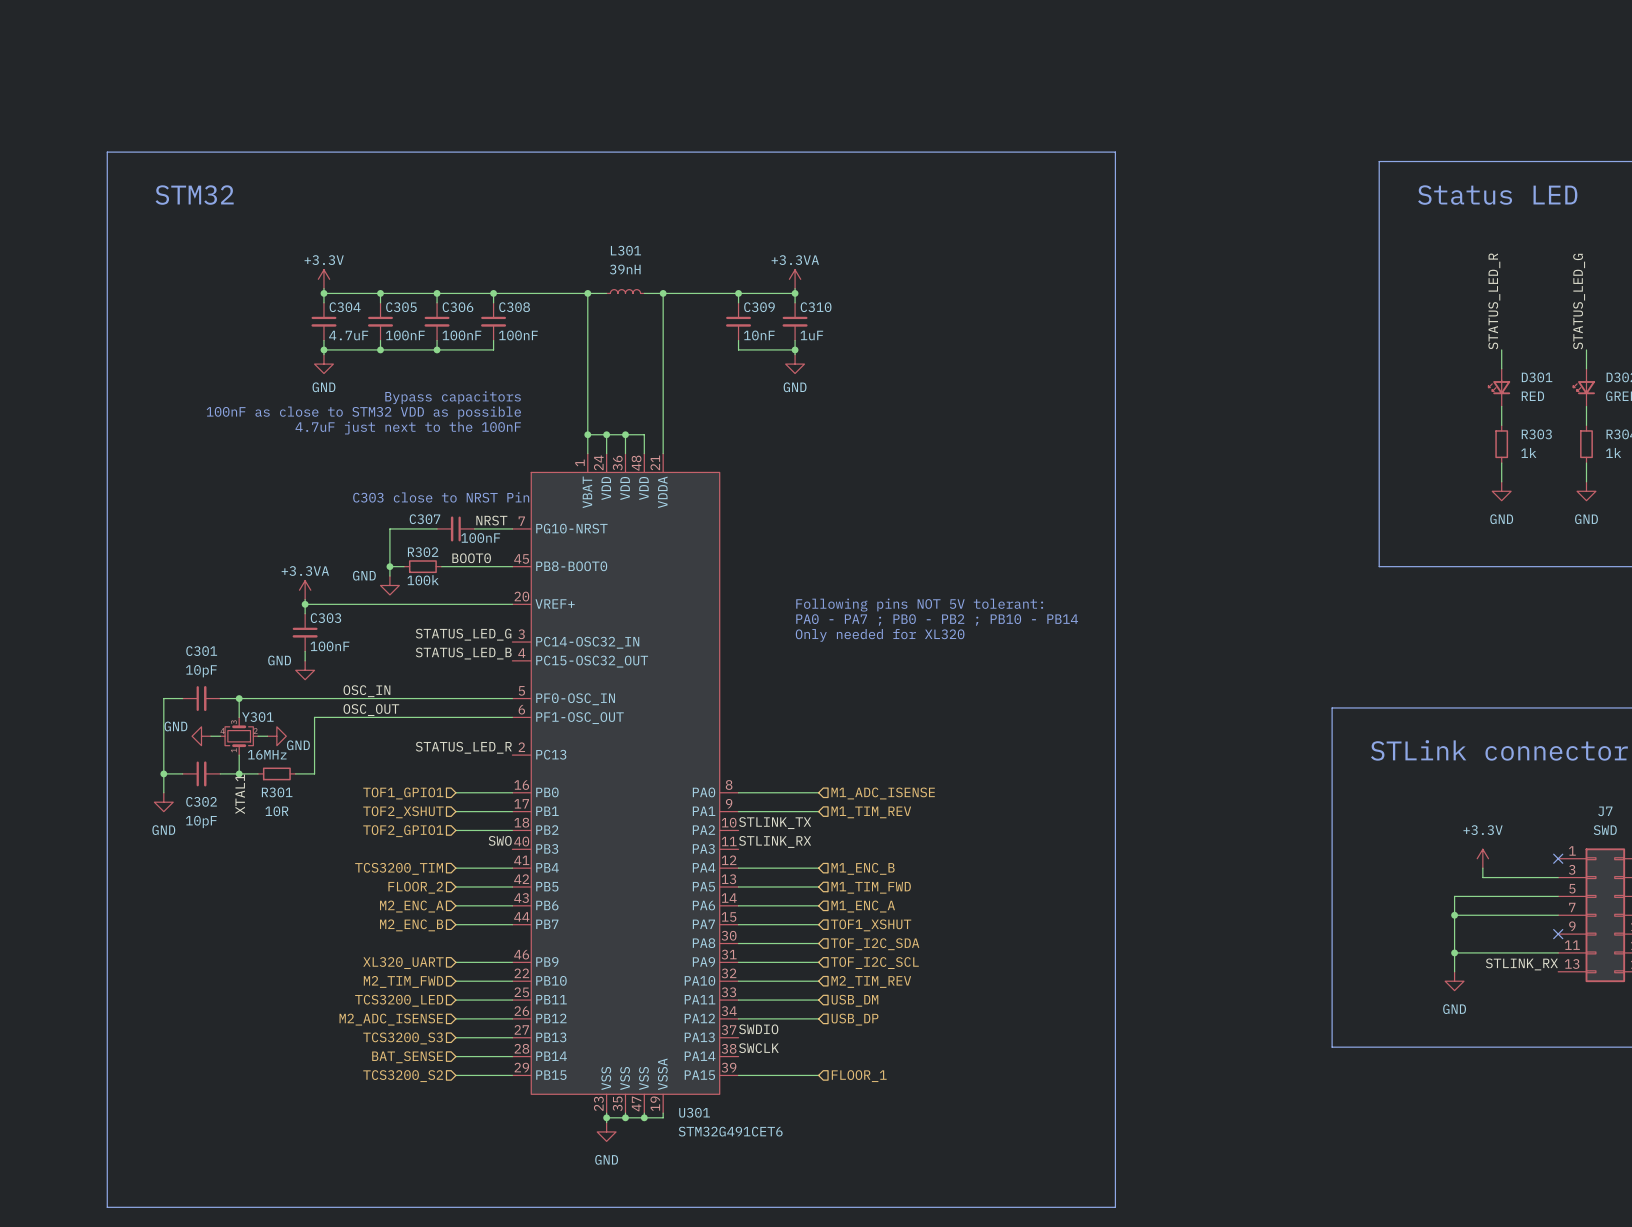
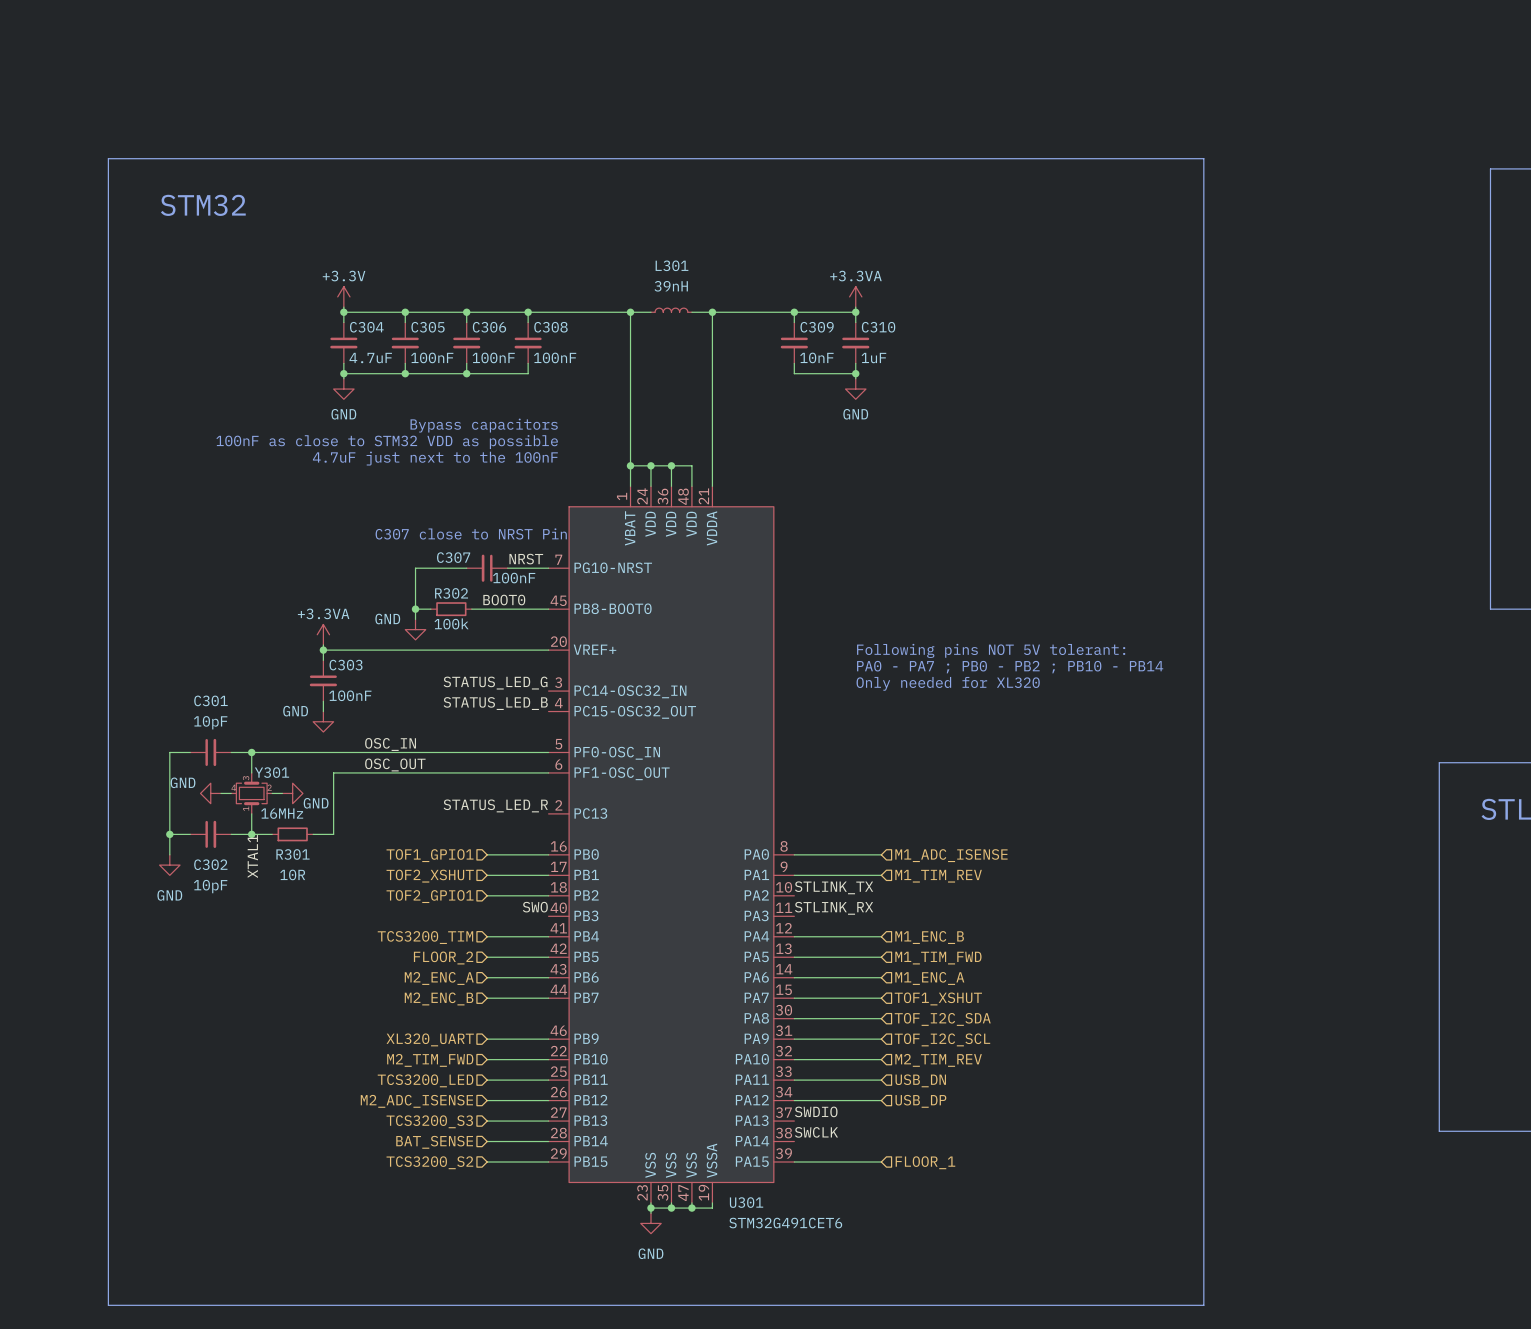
text: C303 close to NRST Pin (441, 497) -> C307 close to NRST Pin (471, 533)
hierarchical label: USB_DM (854, 1000) -> USB_DN (920, 1080)

